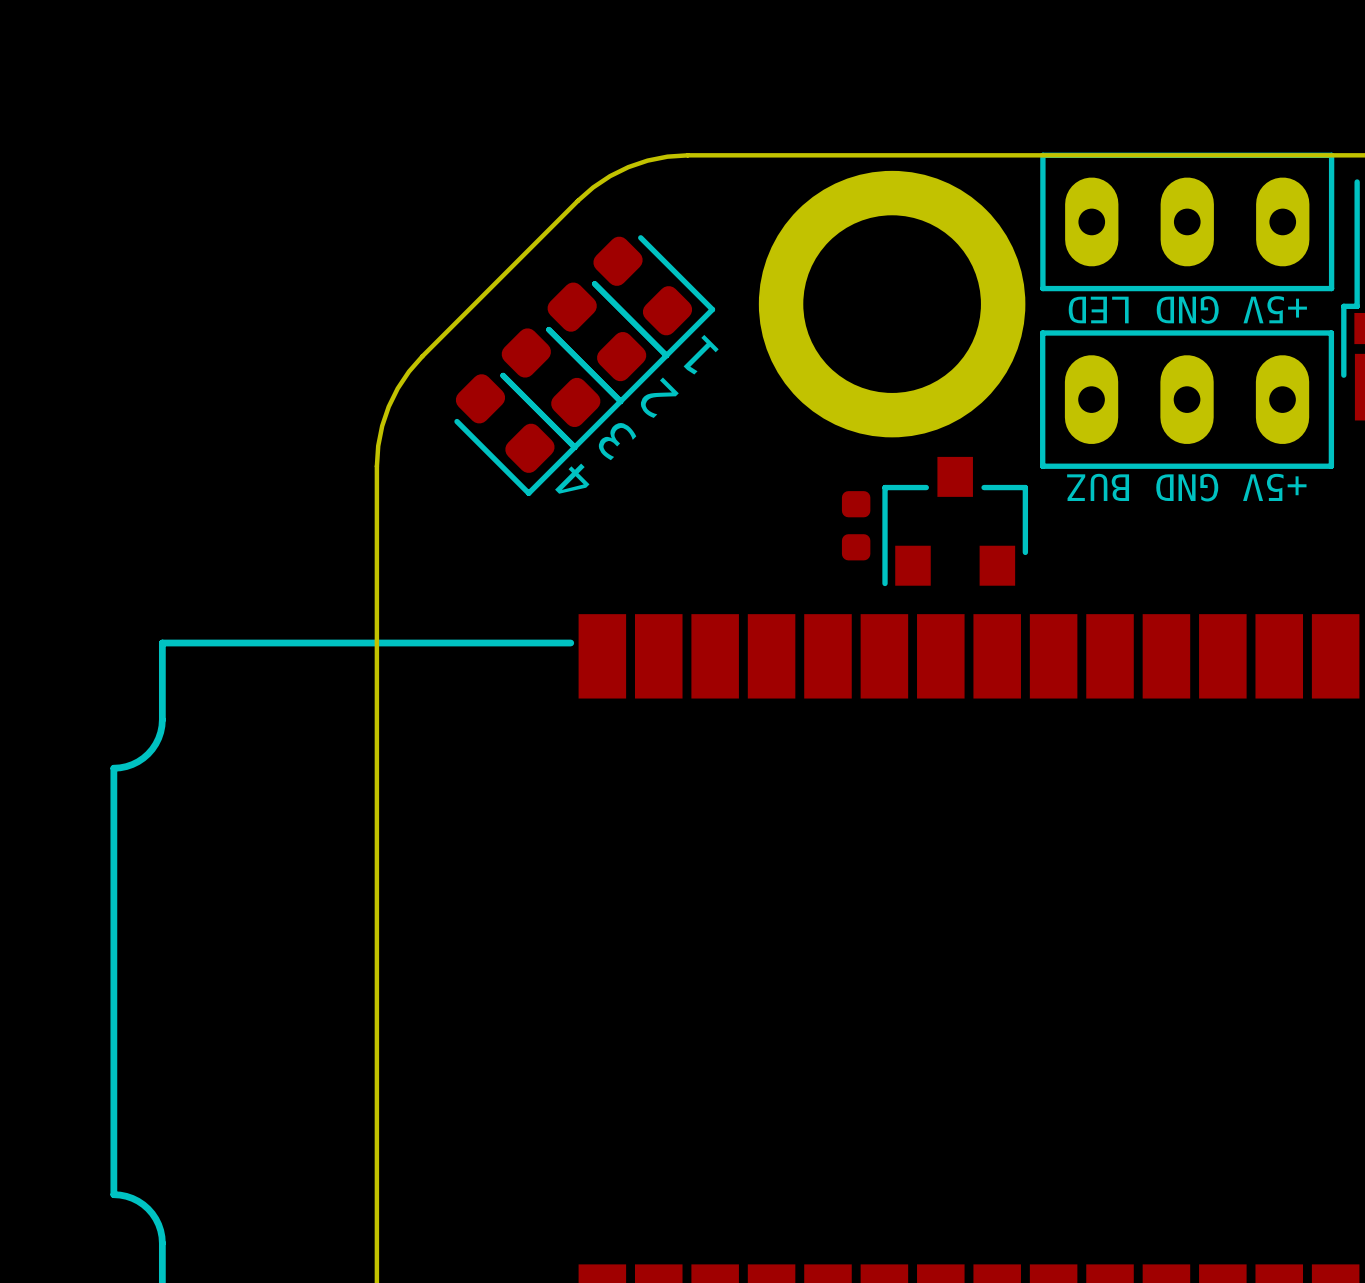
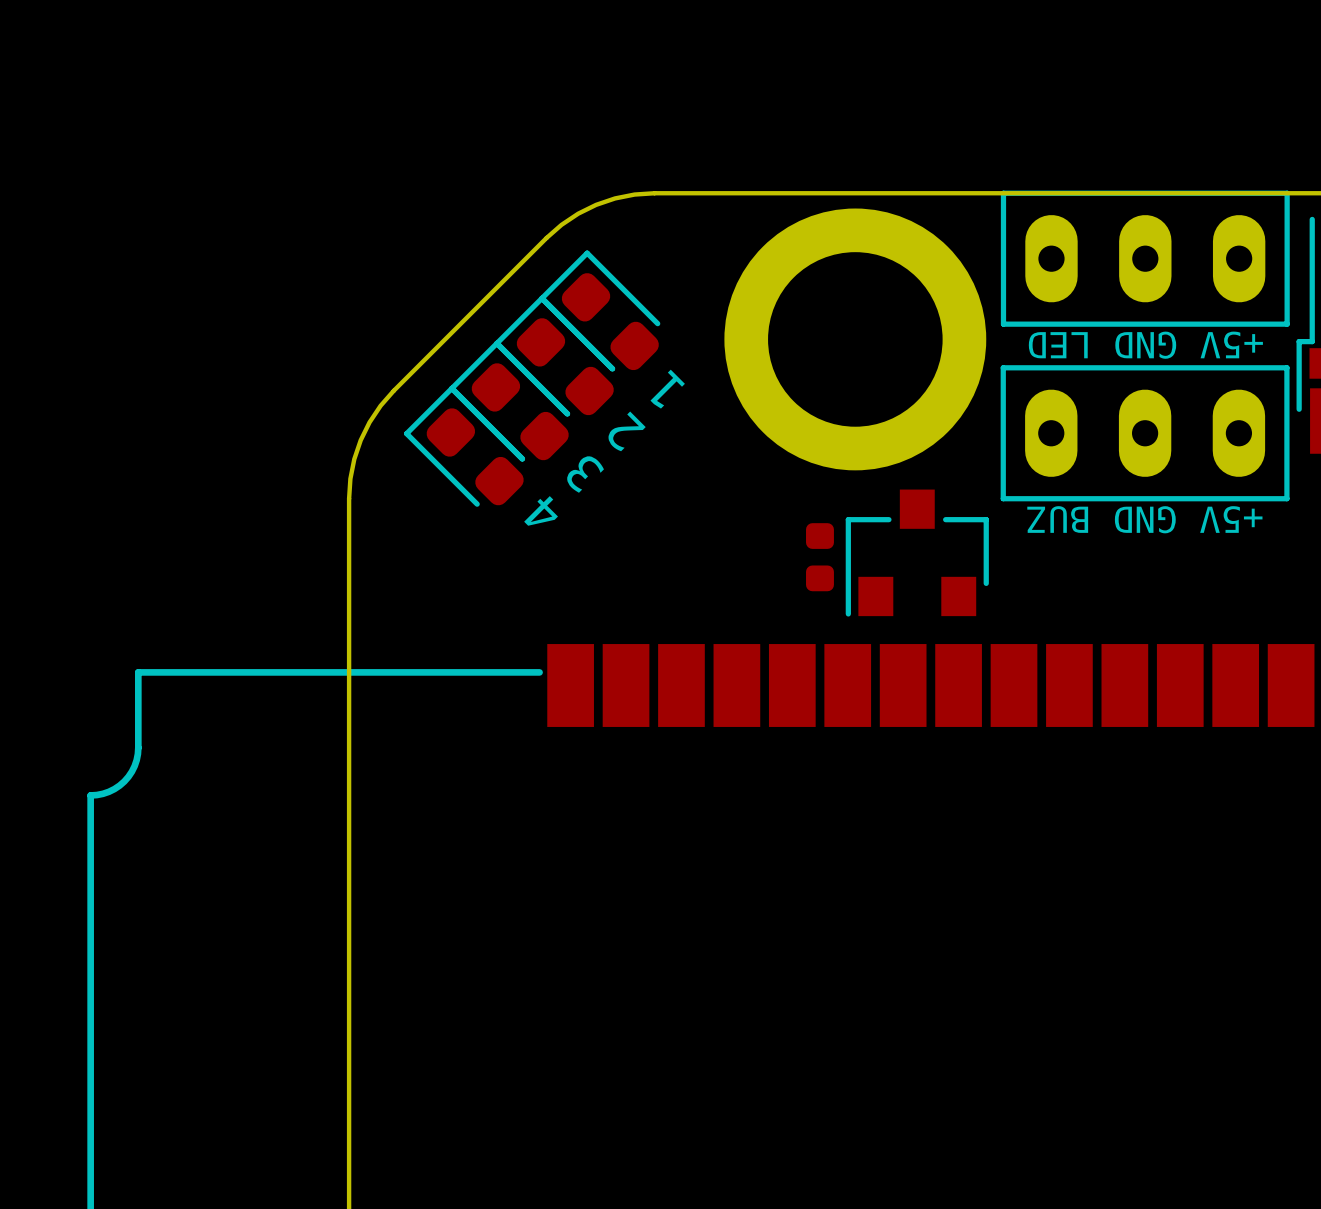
part rotation: 0° (653, 296) -> 180° (599, 311)
part rotation: 0° (607, 342) -> 180° (554, 356)
part rotation: 0° (561, 388) -> 180° (509, 401)
part rotation: 0° (515, 434) -> 180° (464, 446)

